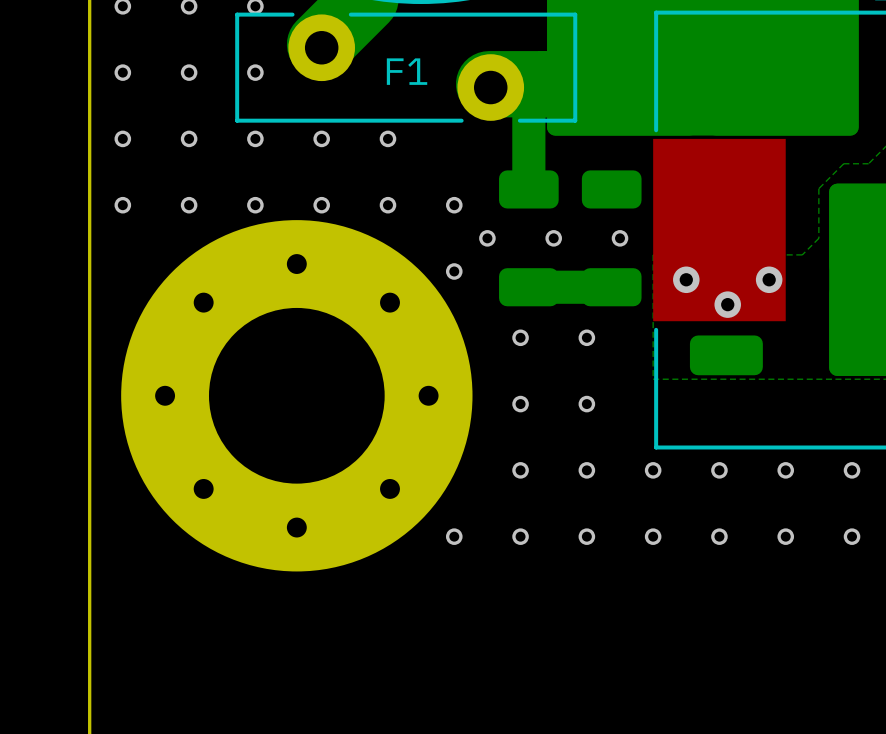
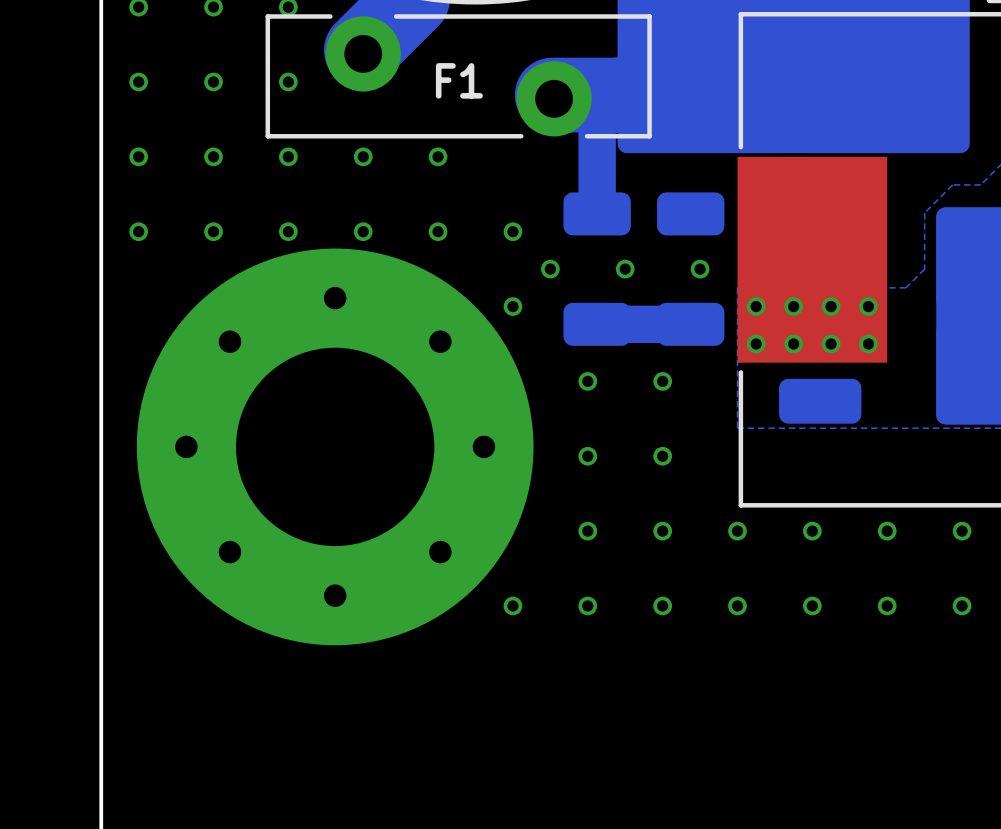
via size: [755, 266, 783, 294] -> [859, 297, 878, 316]
via: none -> (756, 306)
via: none -> (793, 306)
via: none -> (831, 306)
via: (686, 279) -> none
via size: [714, 291, 741, 318] -> [821, 334, 841, 354]
via: none -> (756, 343)
via: none -> (793, 343)
via: none -> (868, 343)

